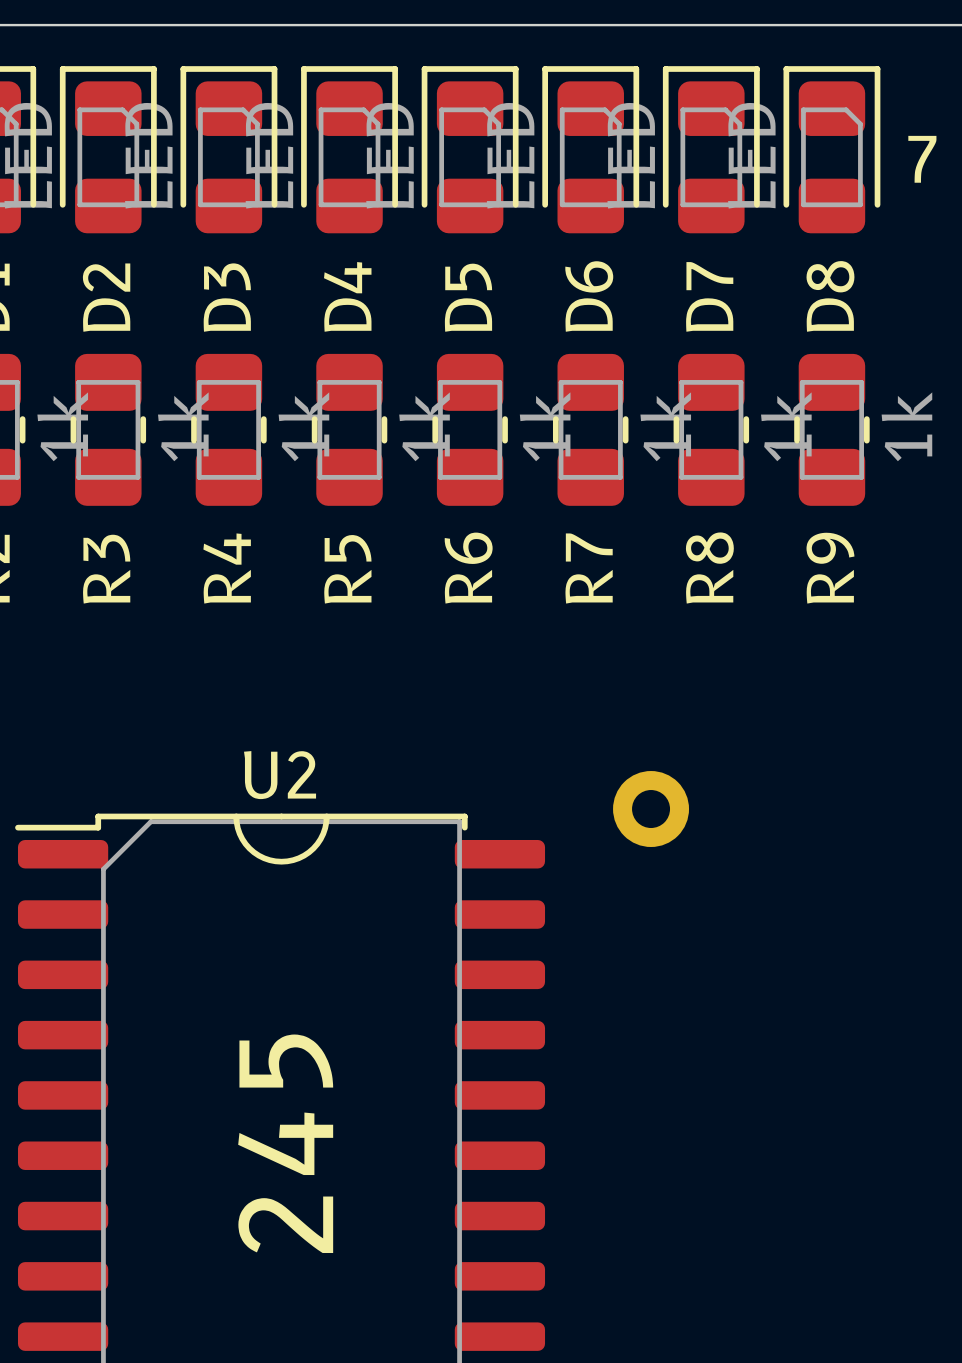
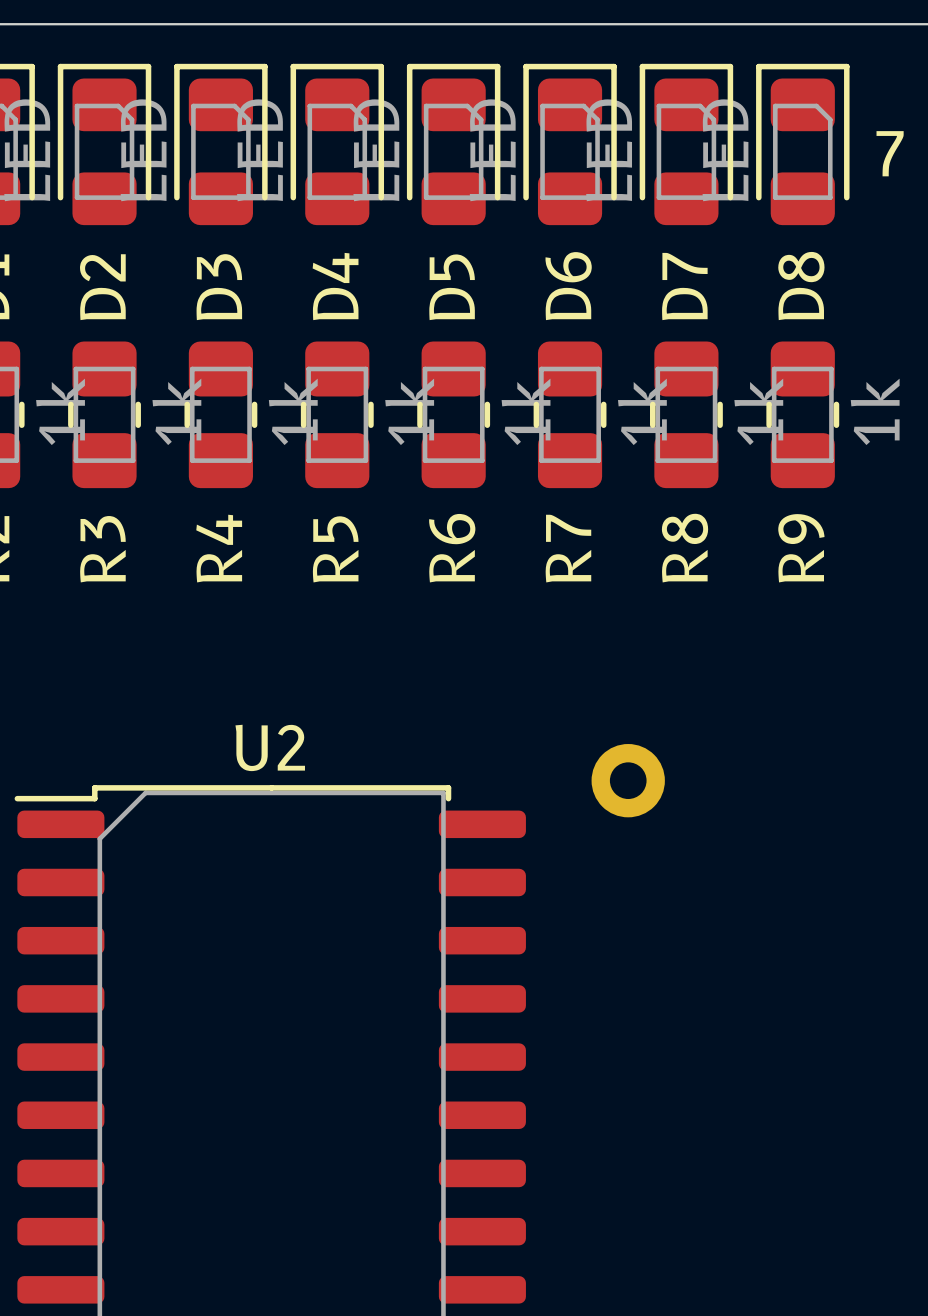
line: (236, 816) (239, 833) (249, 848) (264, 858) (281, 861) (298, 858) (313, 848) (323, 833) (326, 816) -> none
text: 245 (285, 1143) -> none

